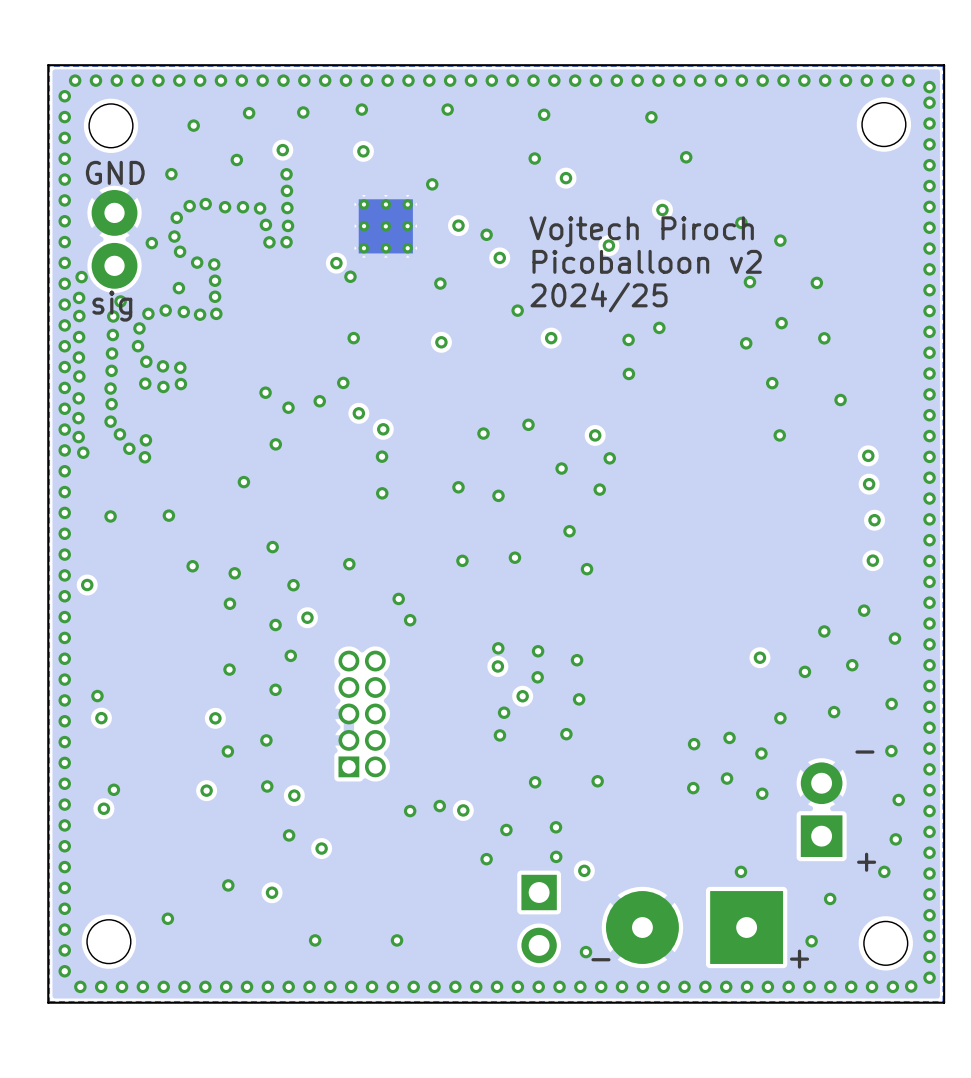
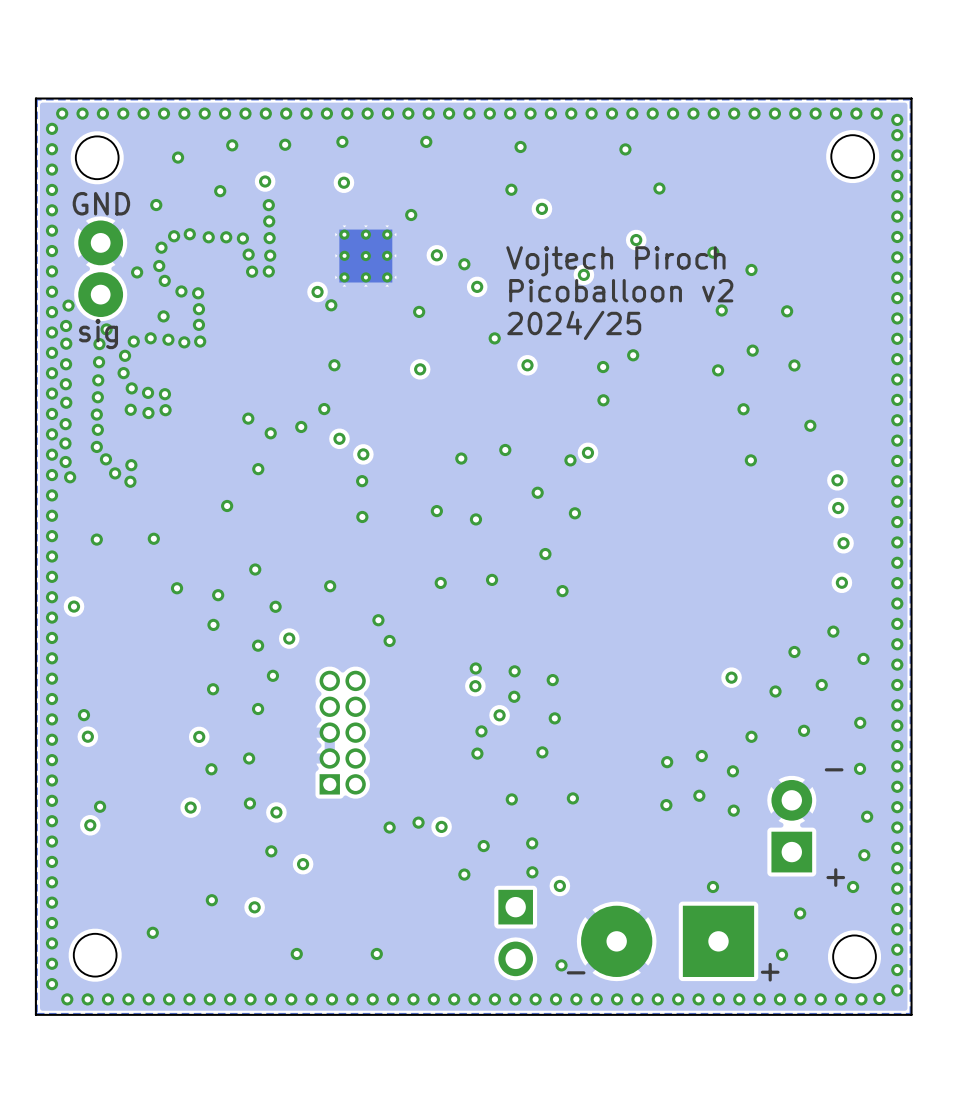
via position: (609, 458) -> (587, 452)

